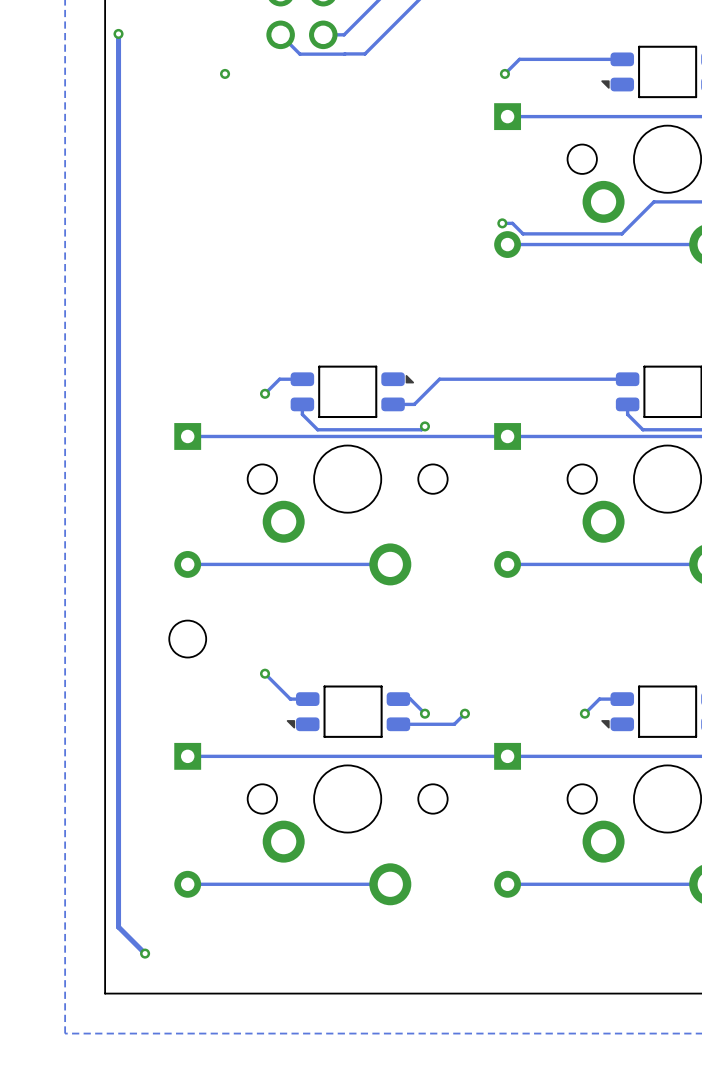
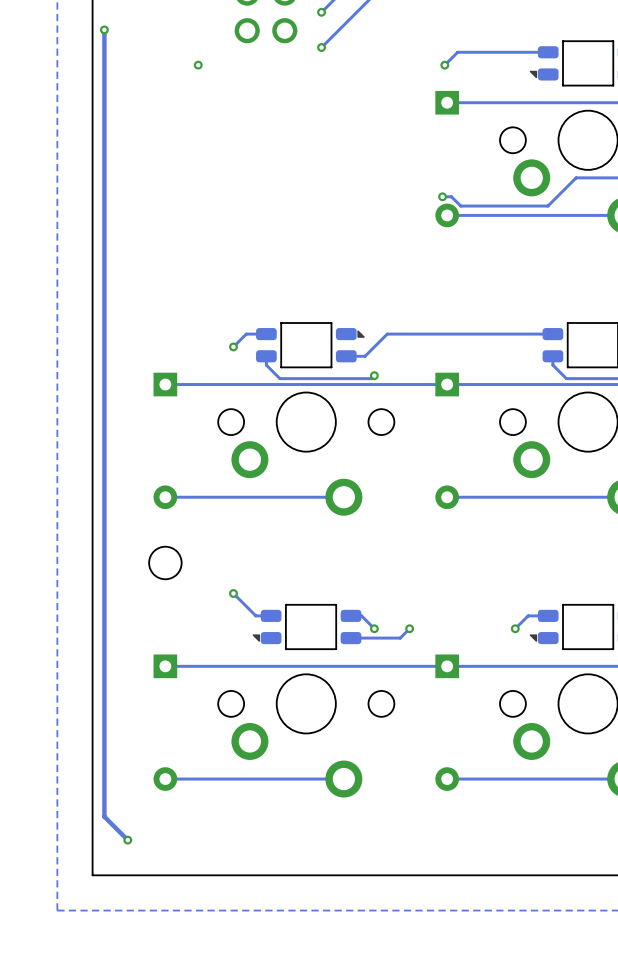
track: (364, 13) (344, 34) (323, 34) -> none
via: none -> (321, 12)
track: (280, 34) (299, 54) (344, 54) -> none
track: (364, 53) (345, 53) -> none
via: none -> (321, 47)

